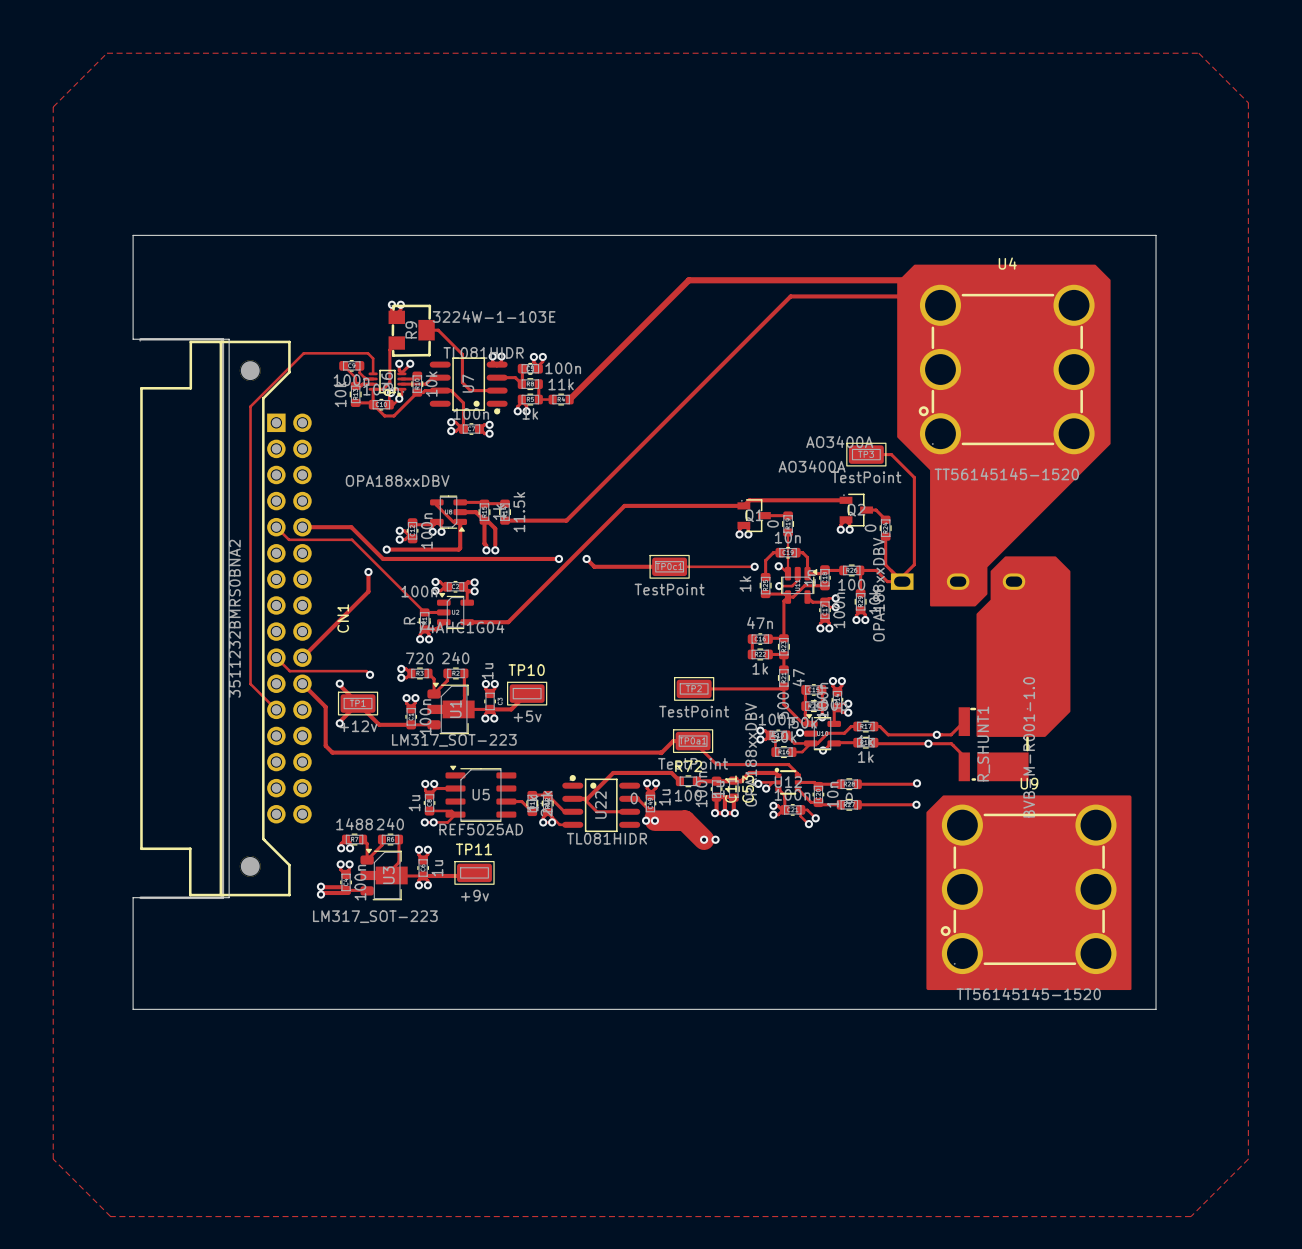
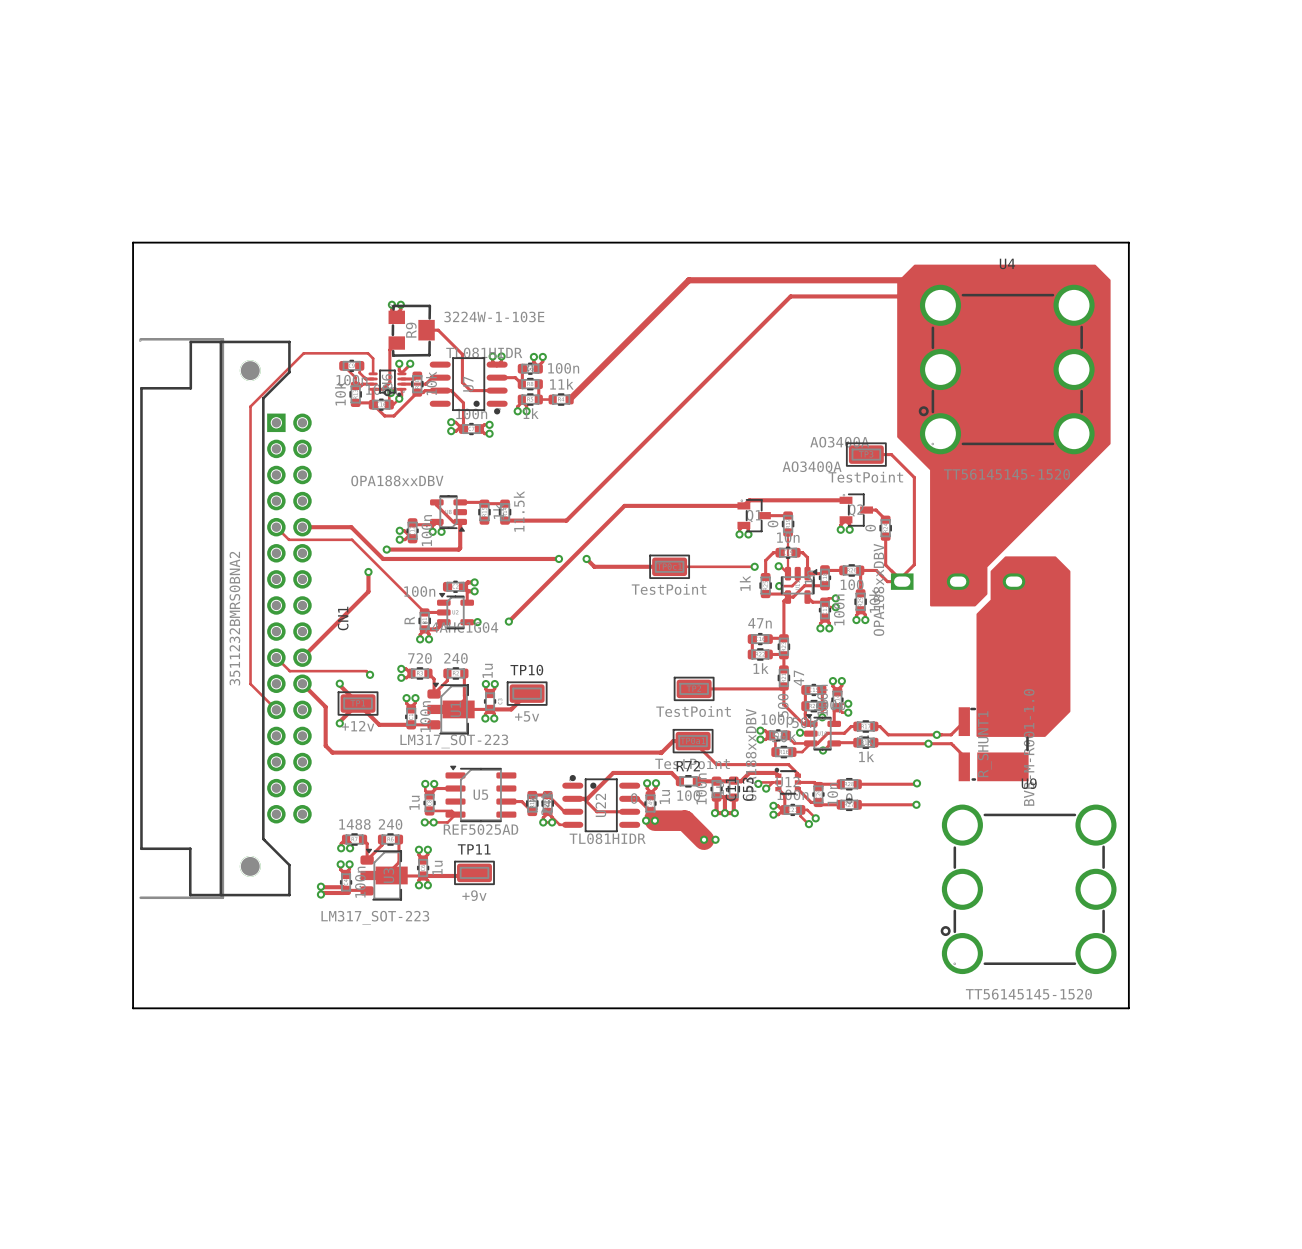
zone outline: (107, 53) (1198, 53) (1248, 102) (1248, 1159) (1190, 1216) (110, 1216) (53, 1159) (53, 107) (107, 53) -> none
board edge: (133, 242) (133, 235) (1156, 235) (1156, 1009) (133, 1008) -> (133, 242) (1128, 242) (1128, 1008) (133, 1008)
board edge: (133, 339) (229, 339) (229, 897) (133, 897) -> (133, 339) (133, 897)
track: (460, 512) (476, 512) (484, 520) -> none
track: (484, 520) (484, 543) (486, 550) -> none
track: (484, 520) (487, 520) (495, 528) (495, 550) -> none
via: (486, 550) -> none
via: (495, 550) -> none
track: (435, 581) (440, 581) (444, 586) (440, 590) (435, 590) -> none
via: (435, 581) -> none
via: (435, 590) -> none
track: (508, 621) (477, 622) -> none
via: none -> (508, 621)
via: none -> (477, 622)
drawing: [926, 795, 1132, 991] -> none

